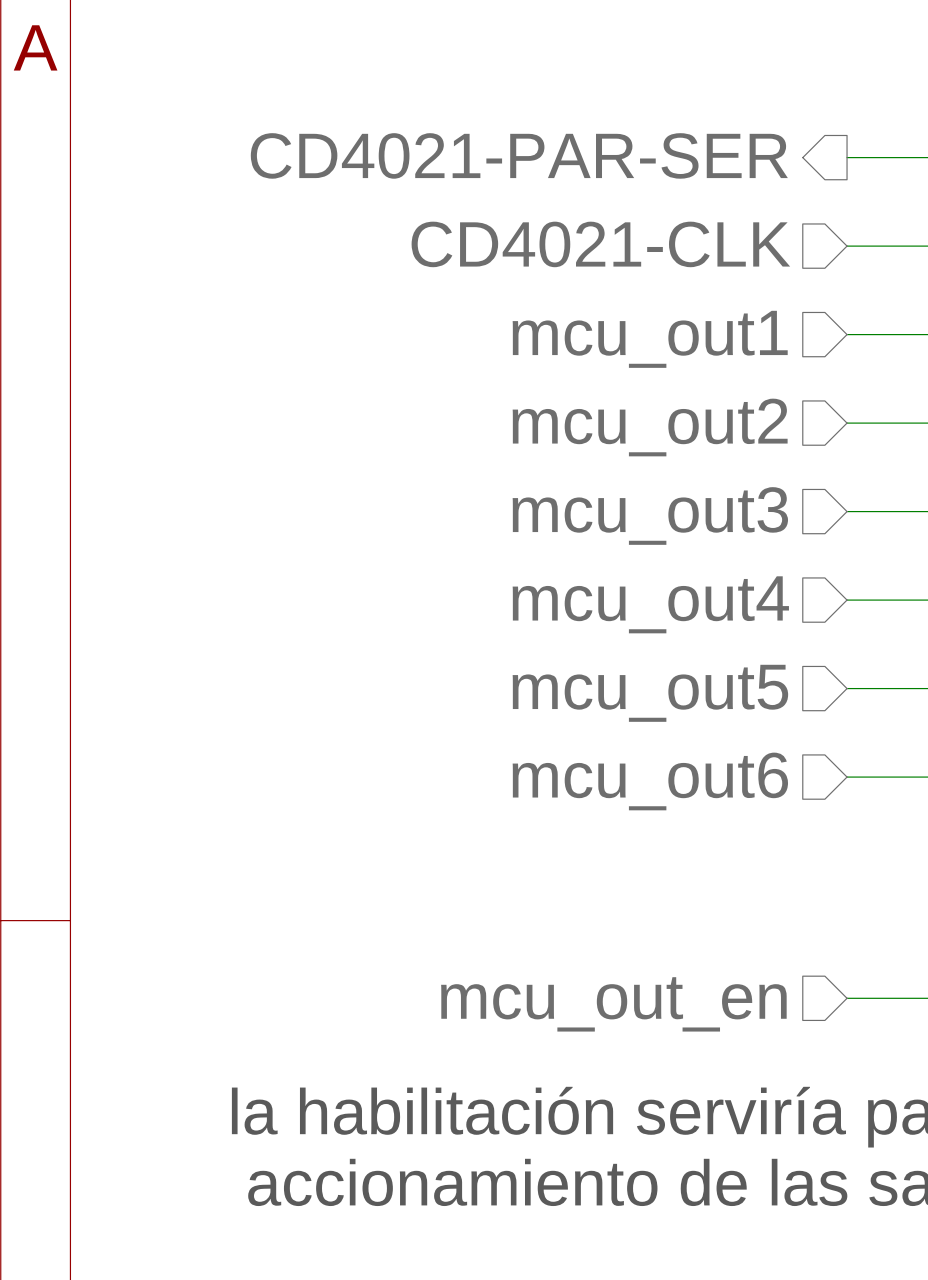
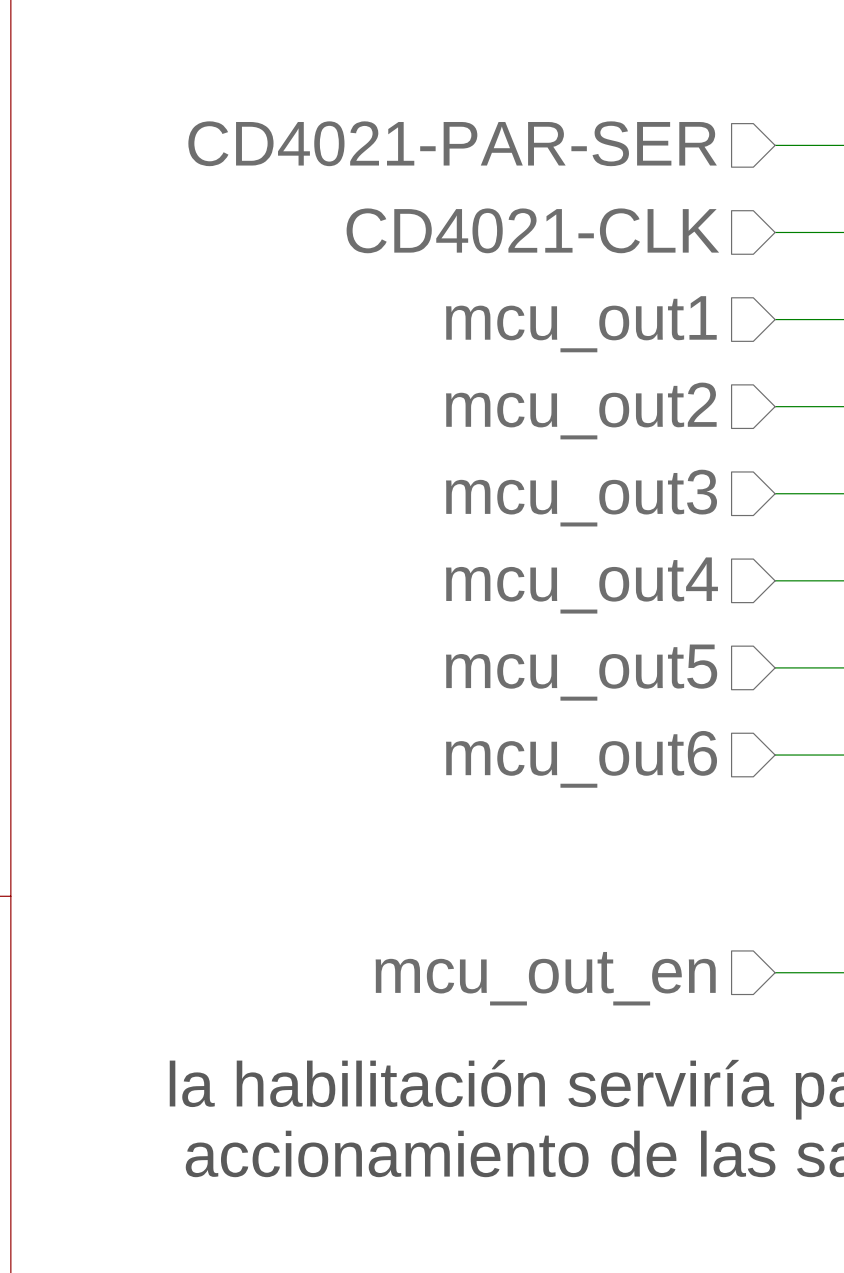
hierarchical label shape: output (519, 155) -> input (452, 143)

